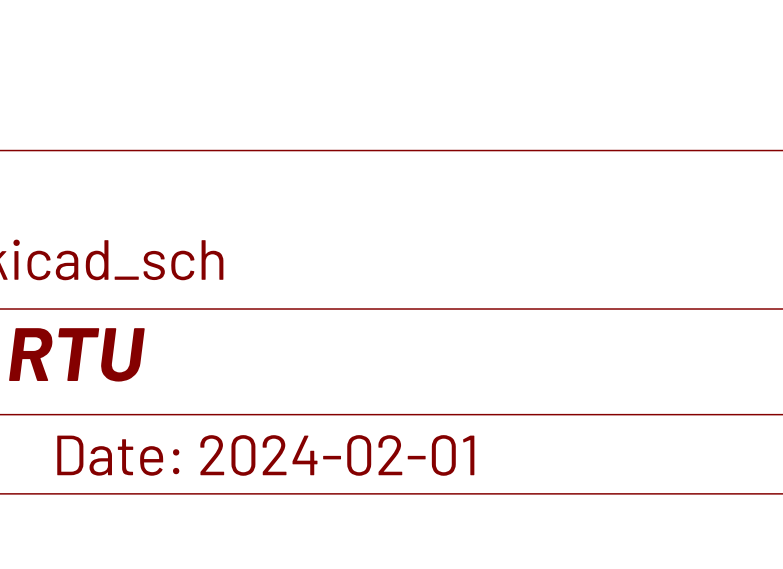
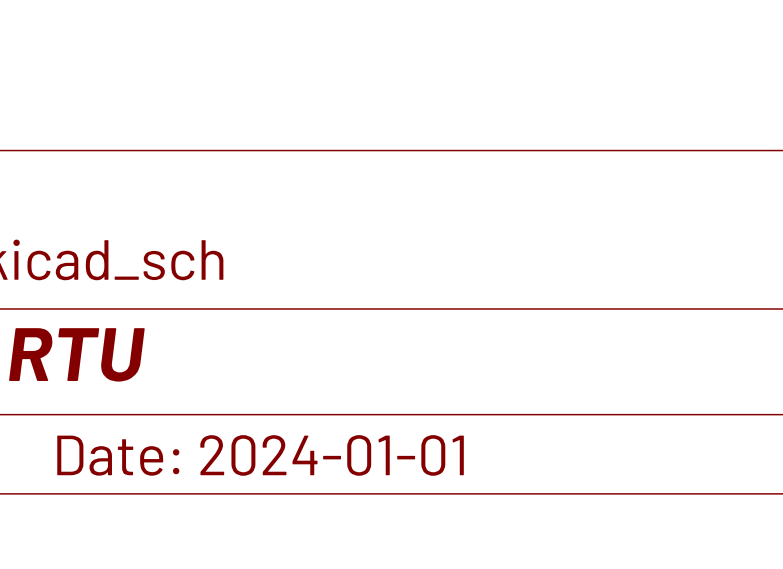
title block: Date: 2024-02-01 (265, 455) -> Date: 2024-01-01 (260, 455)

